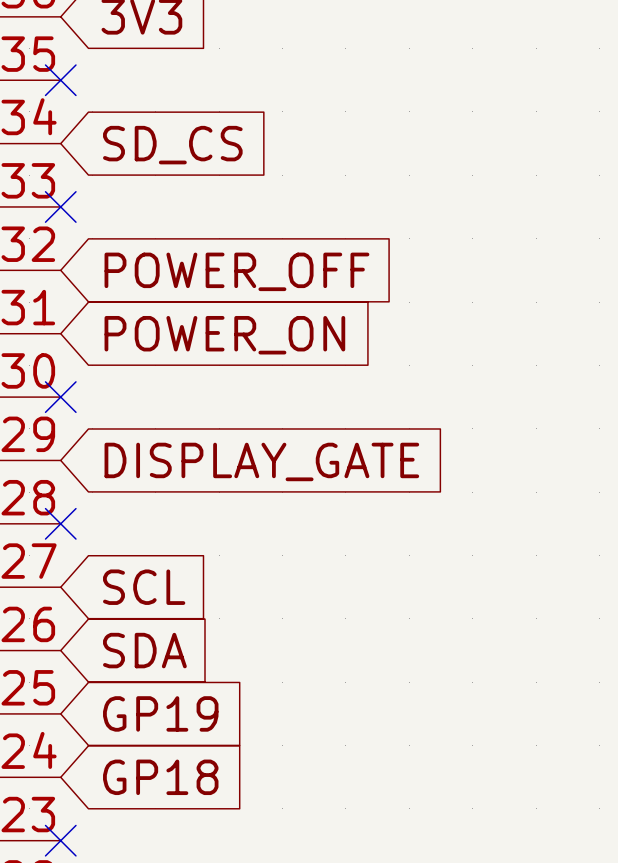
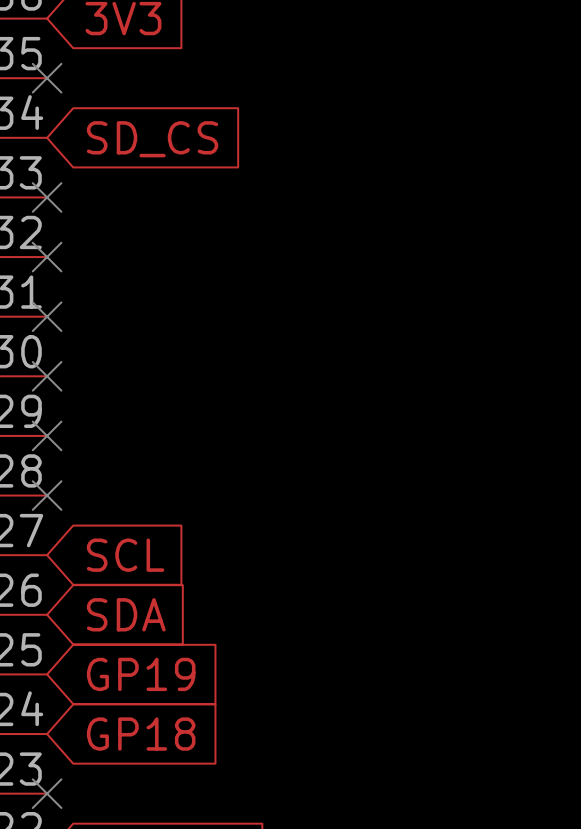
no-connect mark: none -> (47, 257)
global label: POWER_OFF (236, 271) -> none
no-connect mark: none -> (47, 316)
global label: POWER_ON (224, 335) -> none
no-connect mark: none -> (47, 435)
global label: DISPLAY_GATE (261, 461) -> none

